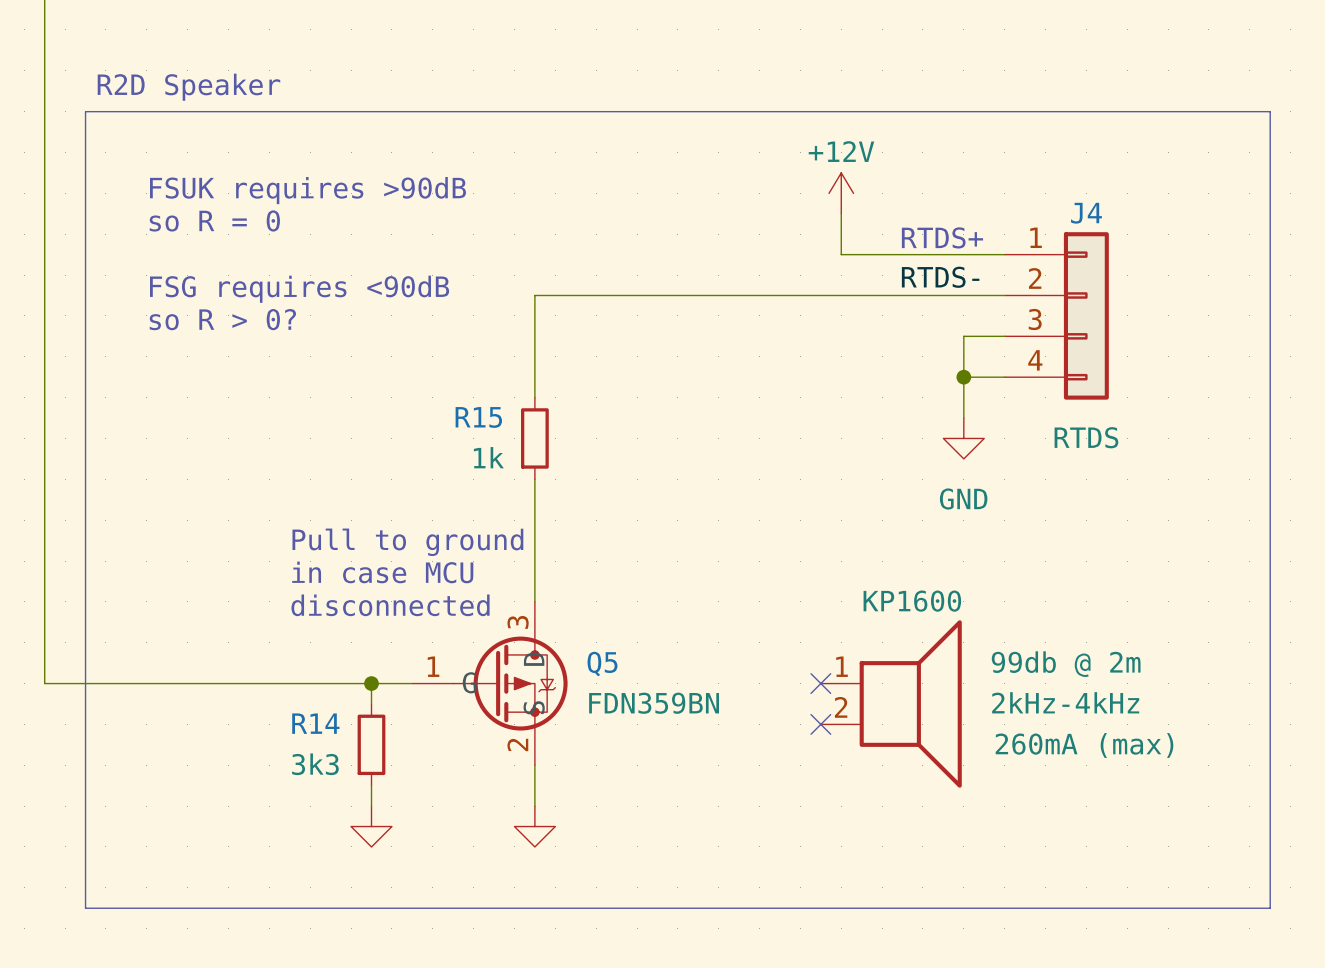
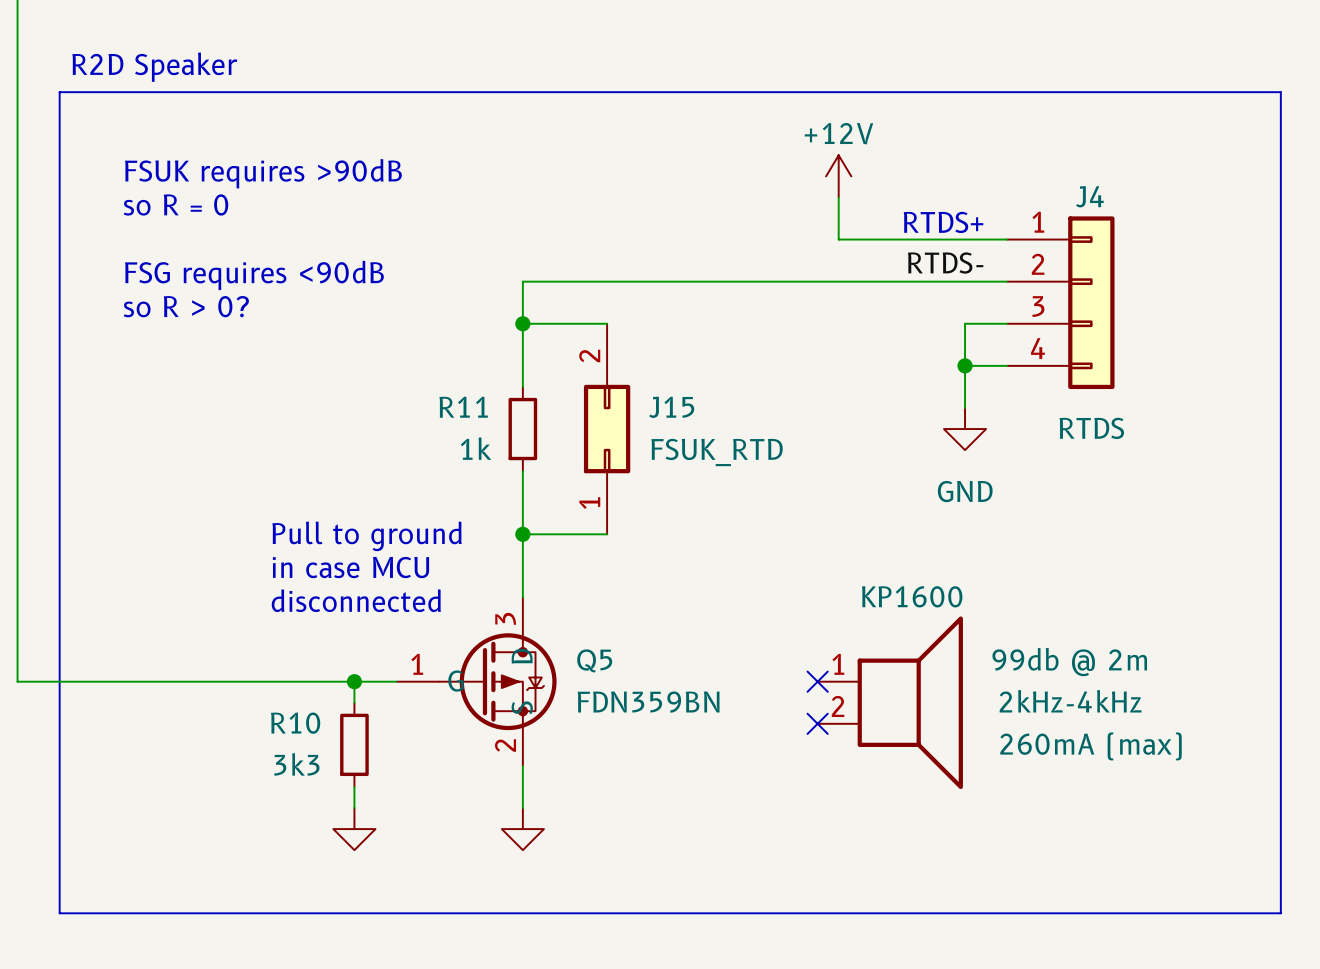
wire: none -> (522, 323) (607, 323)
junction: none -> (522, 323)
R15 name: R15 (478, 417) -> R11 (463, 407)
J15: none -> FSUK_RTD (607, 429)
wire: none -> (522, 534) (607, 534)
junction: none -> (522, 534)
R14 name: R14 (315, 723) -> R10 (295, 723)

